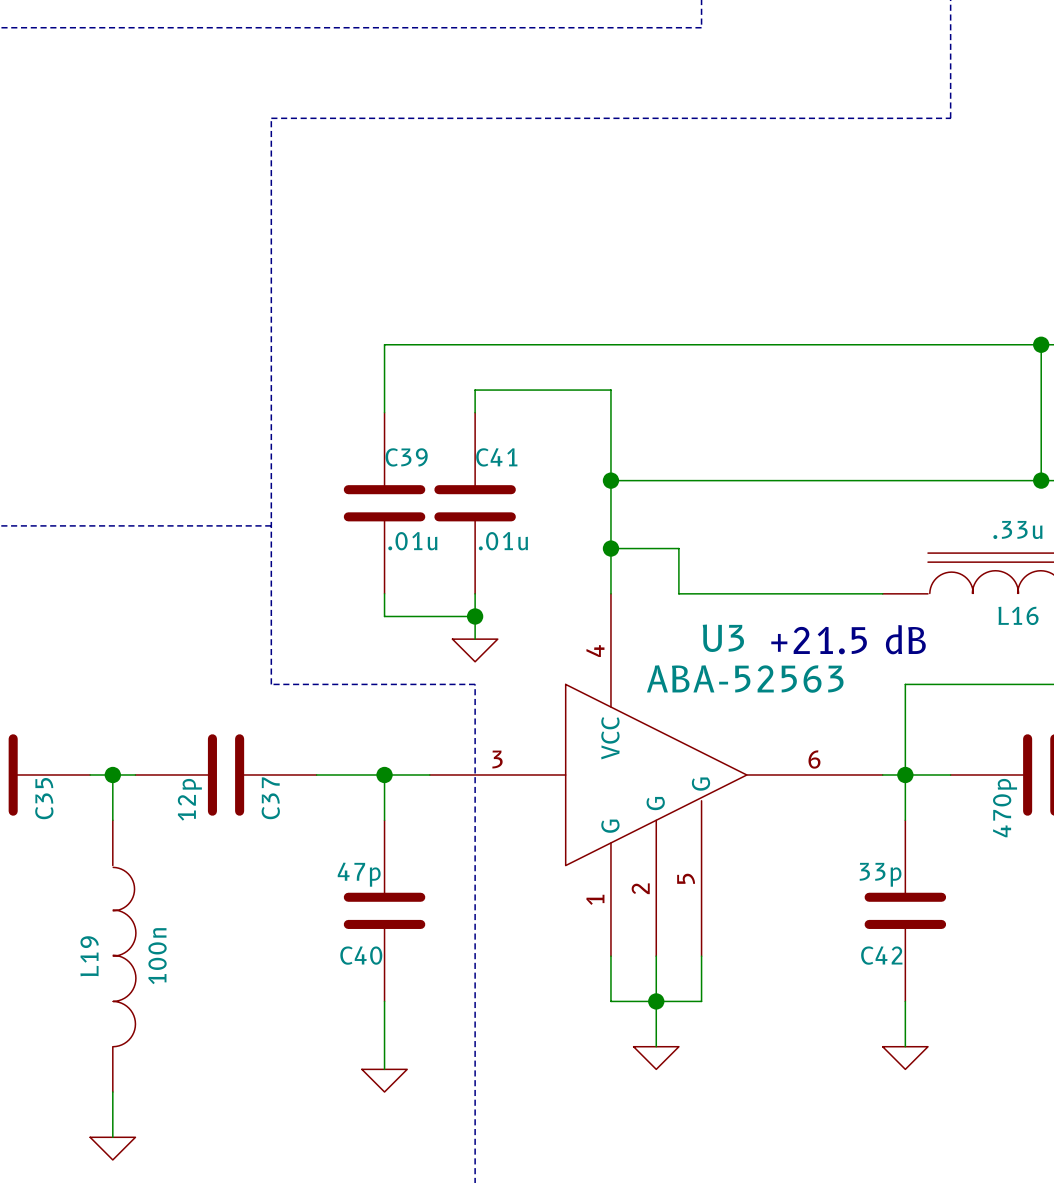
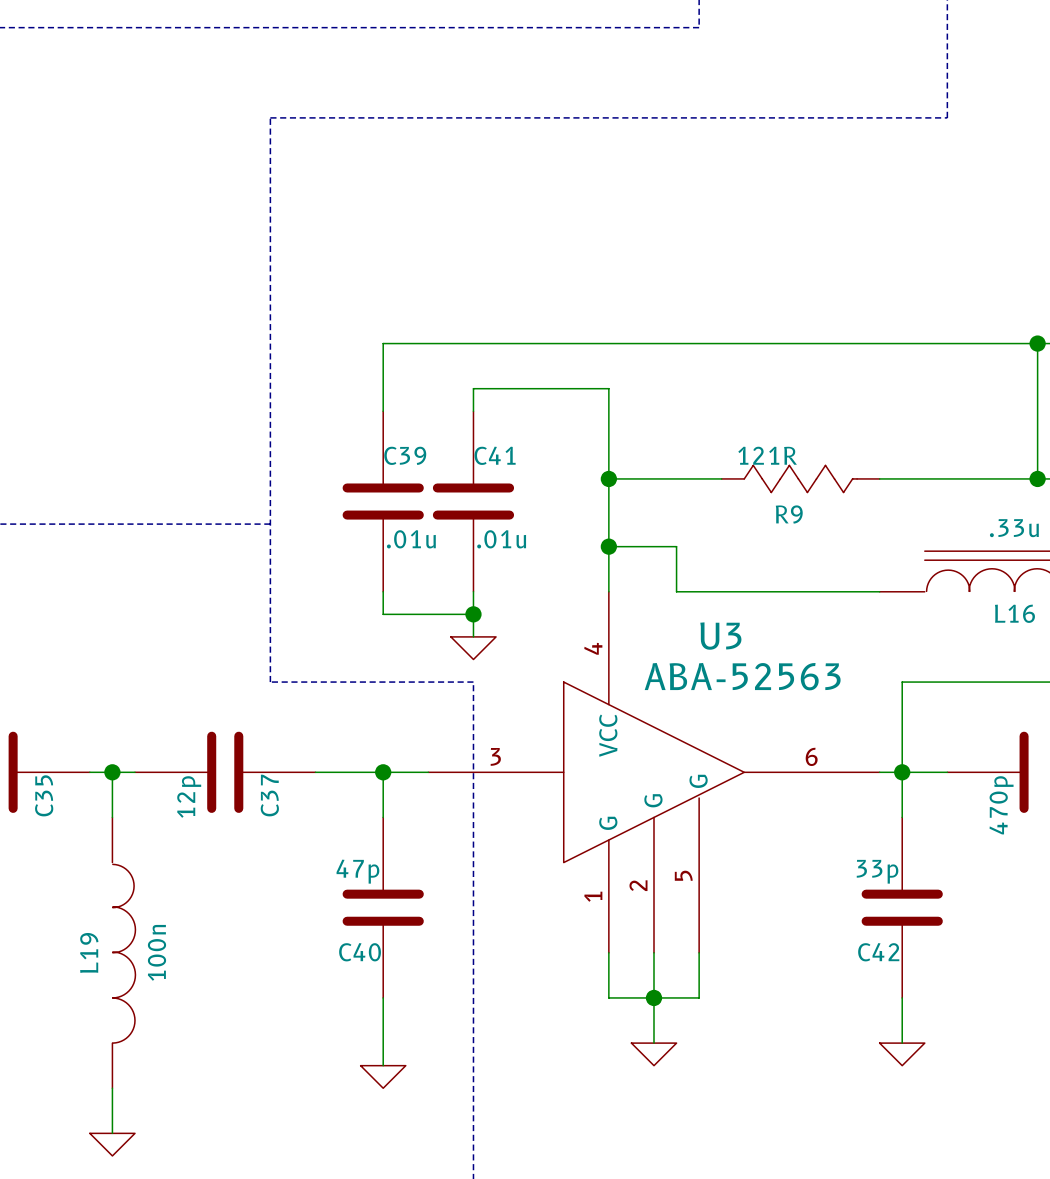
wire: (724, 480) (882, 480) -> none
R9: none -> 121R (800, 478)
text: +21.5 dB (848, 639) -> none

